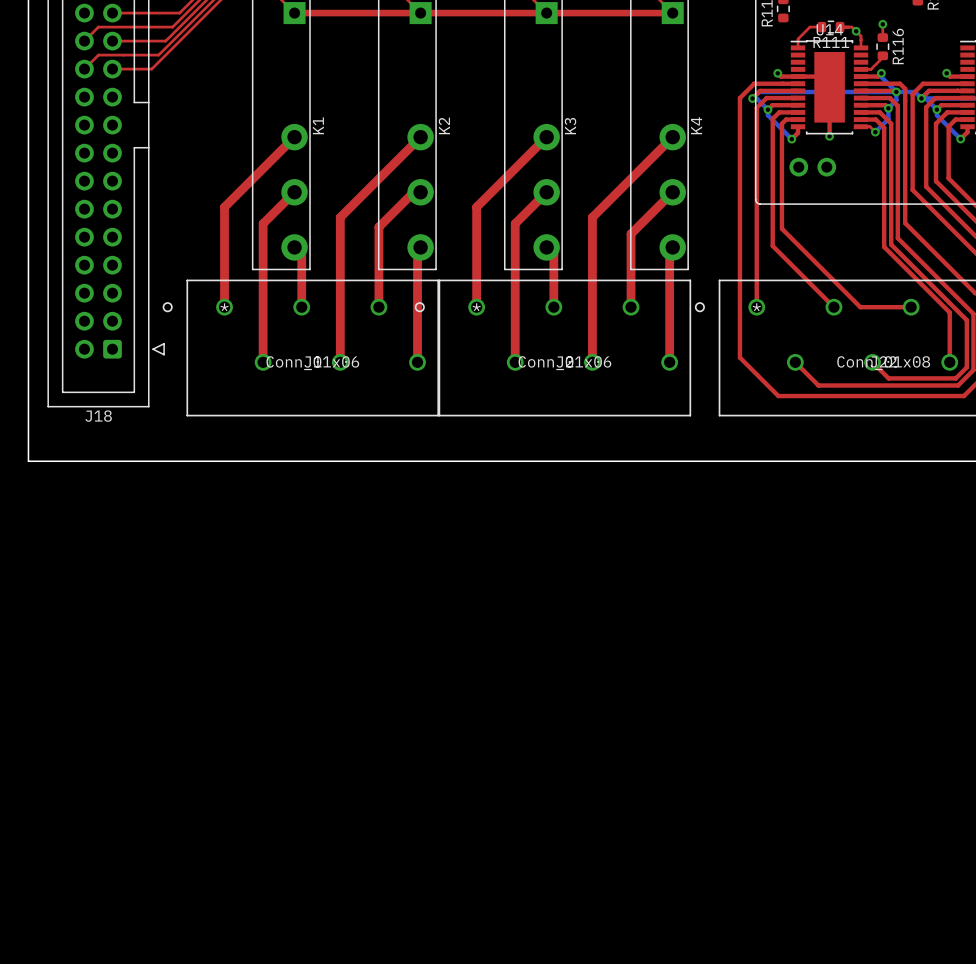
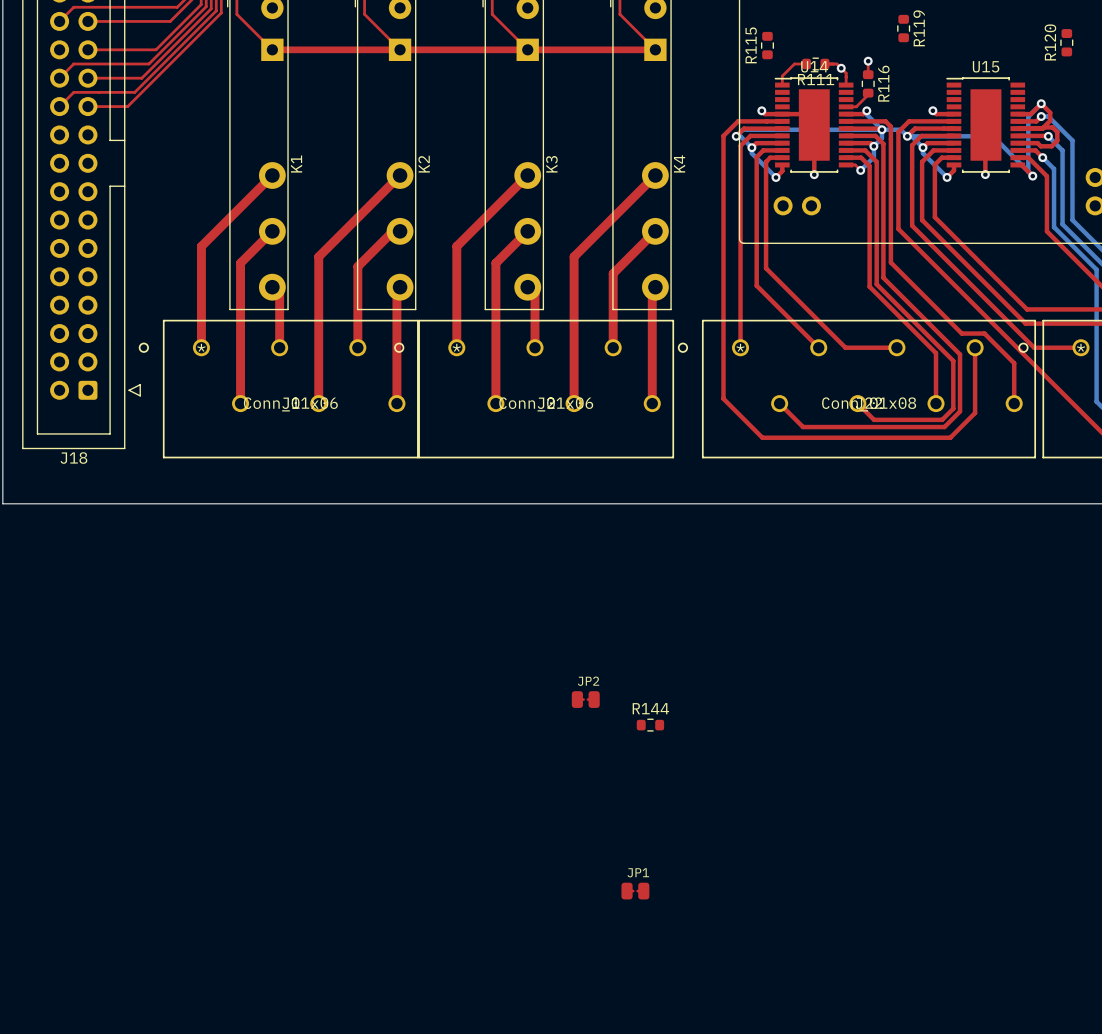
JP2: none -> (585, 699)
R144: none -> (650, 725)
JP1: none -> (635, 891)

